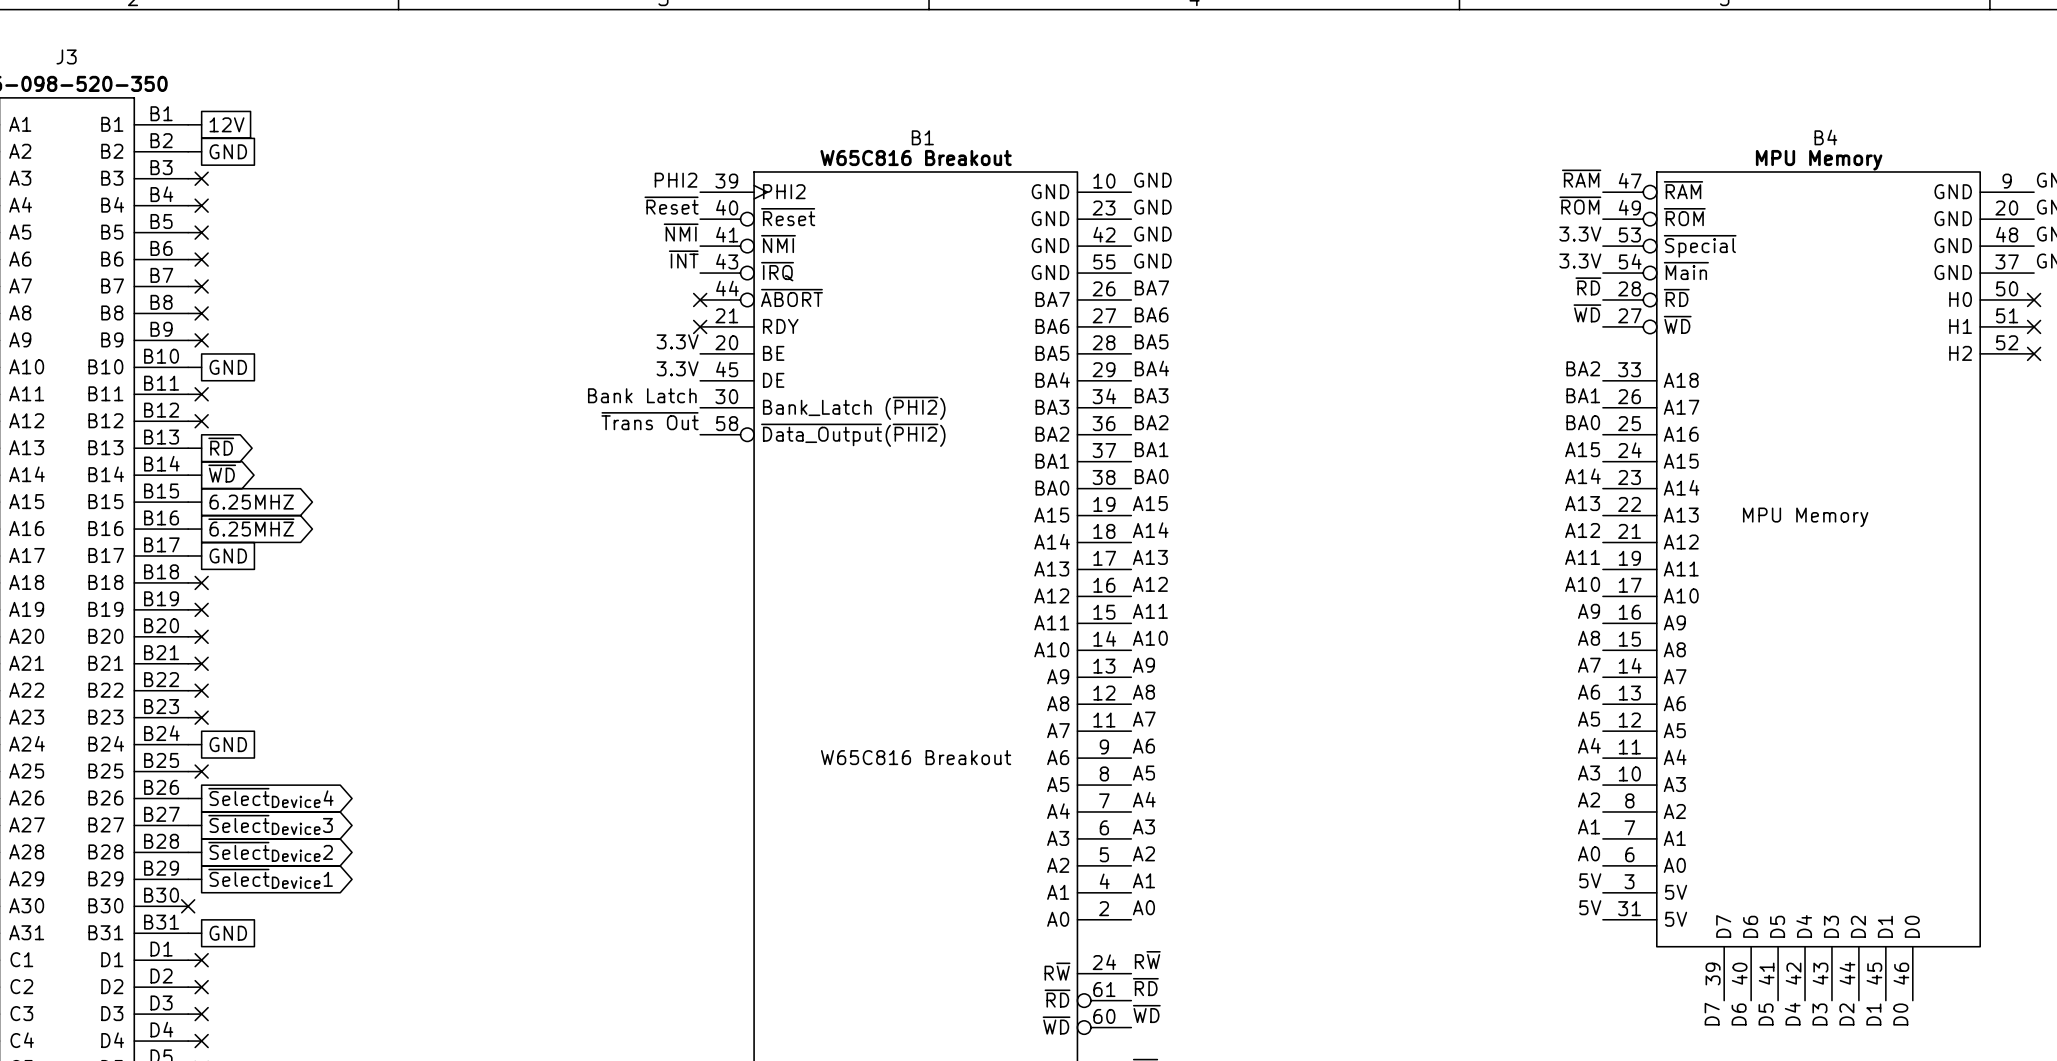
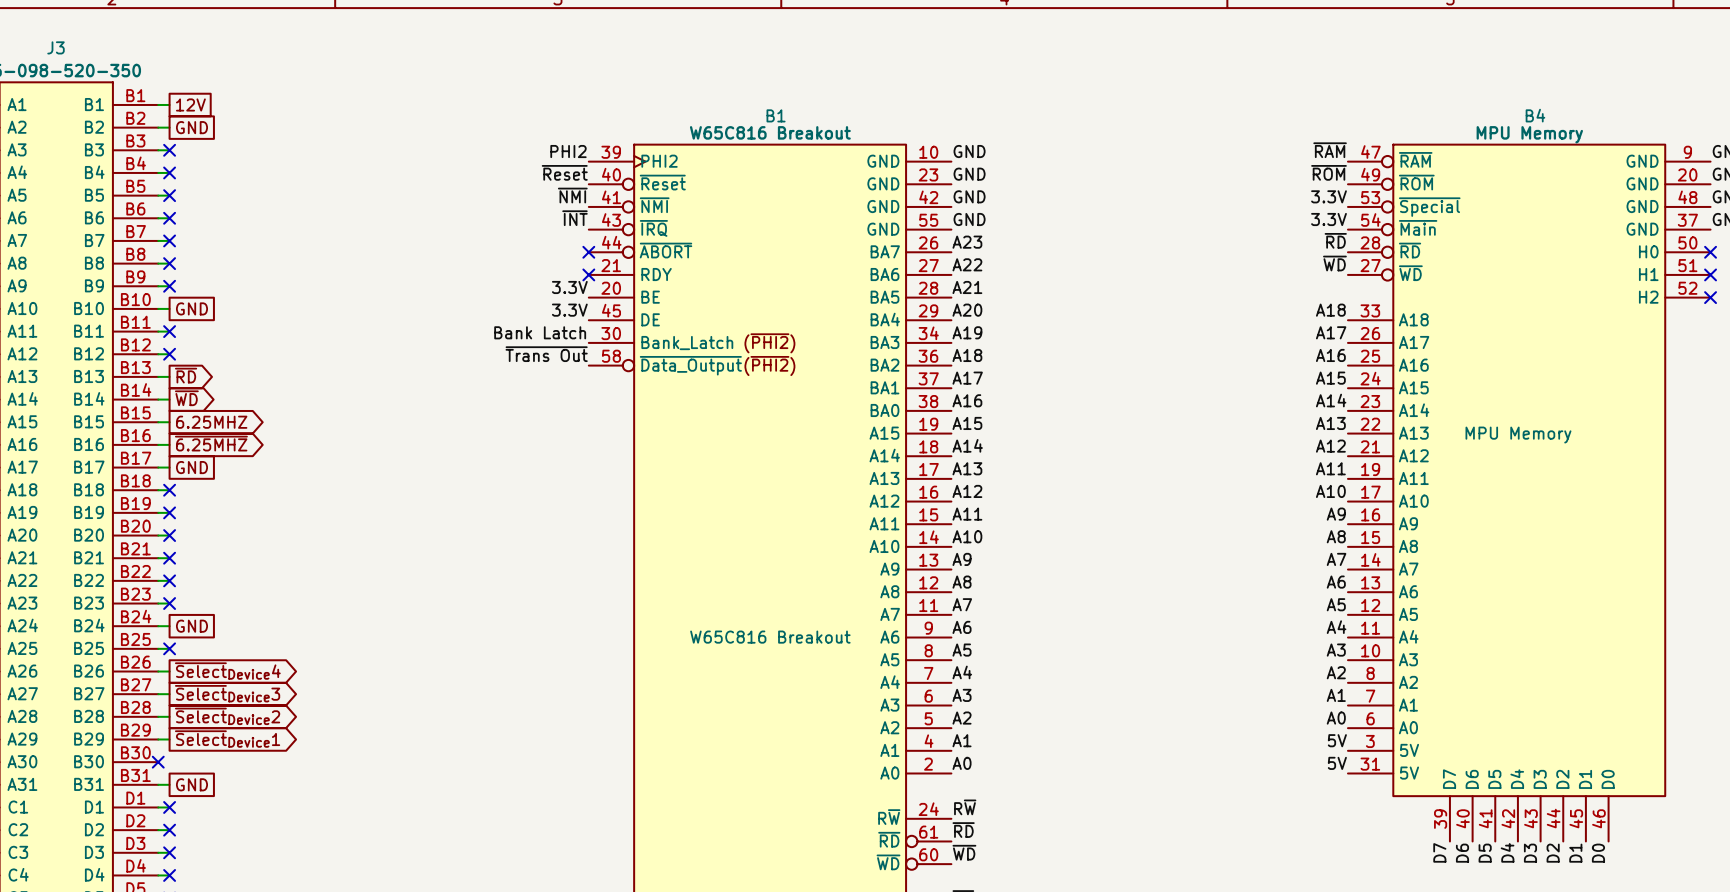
label: BA7 (1151, 287) -> A23 (967, 242)
label: BA6 (1151, 314) -> A22 (967, 264)
label: BA5 (1151, 341) -> A21 (967, 287)
label: BA4 (1151, 368) -> A20 (967, 310)
label: BA2 (1583, 368) -> A18 (1330, 310)
label: BA3 (1151, 395) -> A19 (967, 332)
label: BA1 (1583, 395) -> A17 (1331, 332)
label: BA2 (1151, 422) -> A18 (967, 355)
label: BA0 (1583, 422) -> A16 (1330, 355)
label: BA1 (1151, 449) -> A17 (967, 378)
label: BA0 (1151, 476) -> A16 (967, 400)

